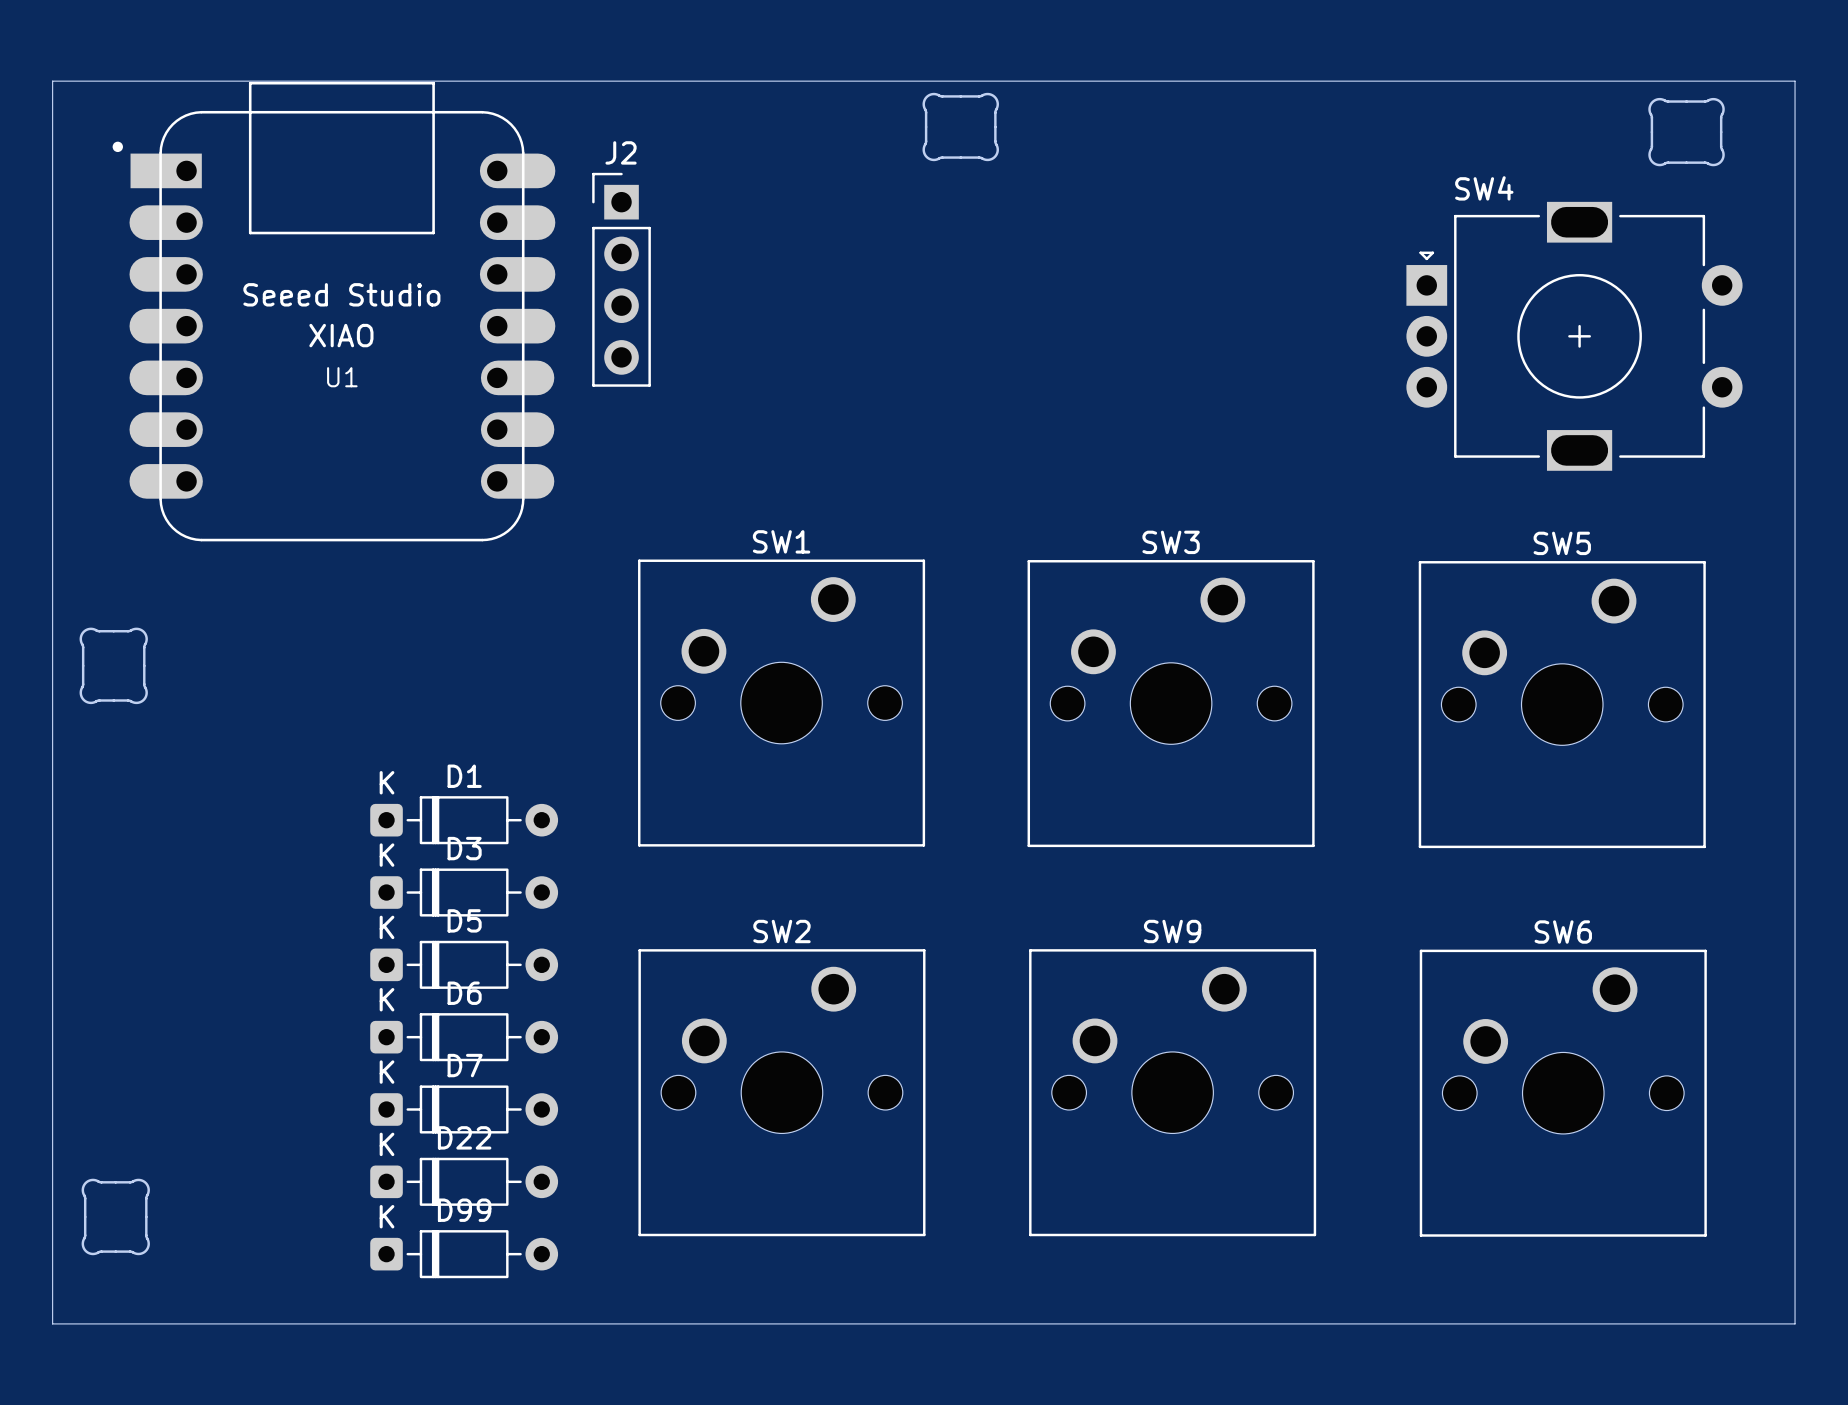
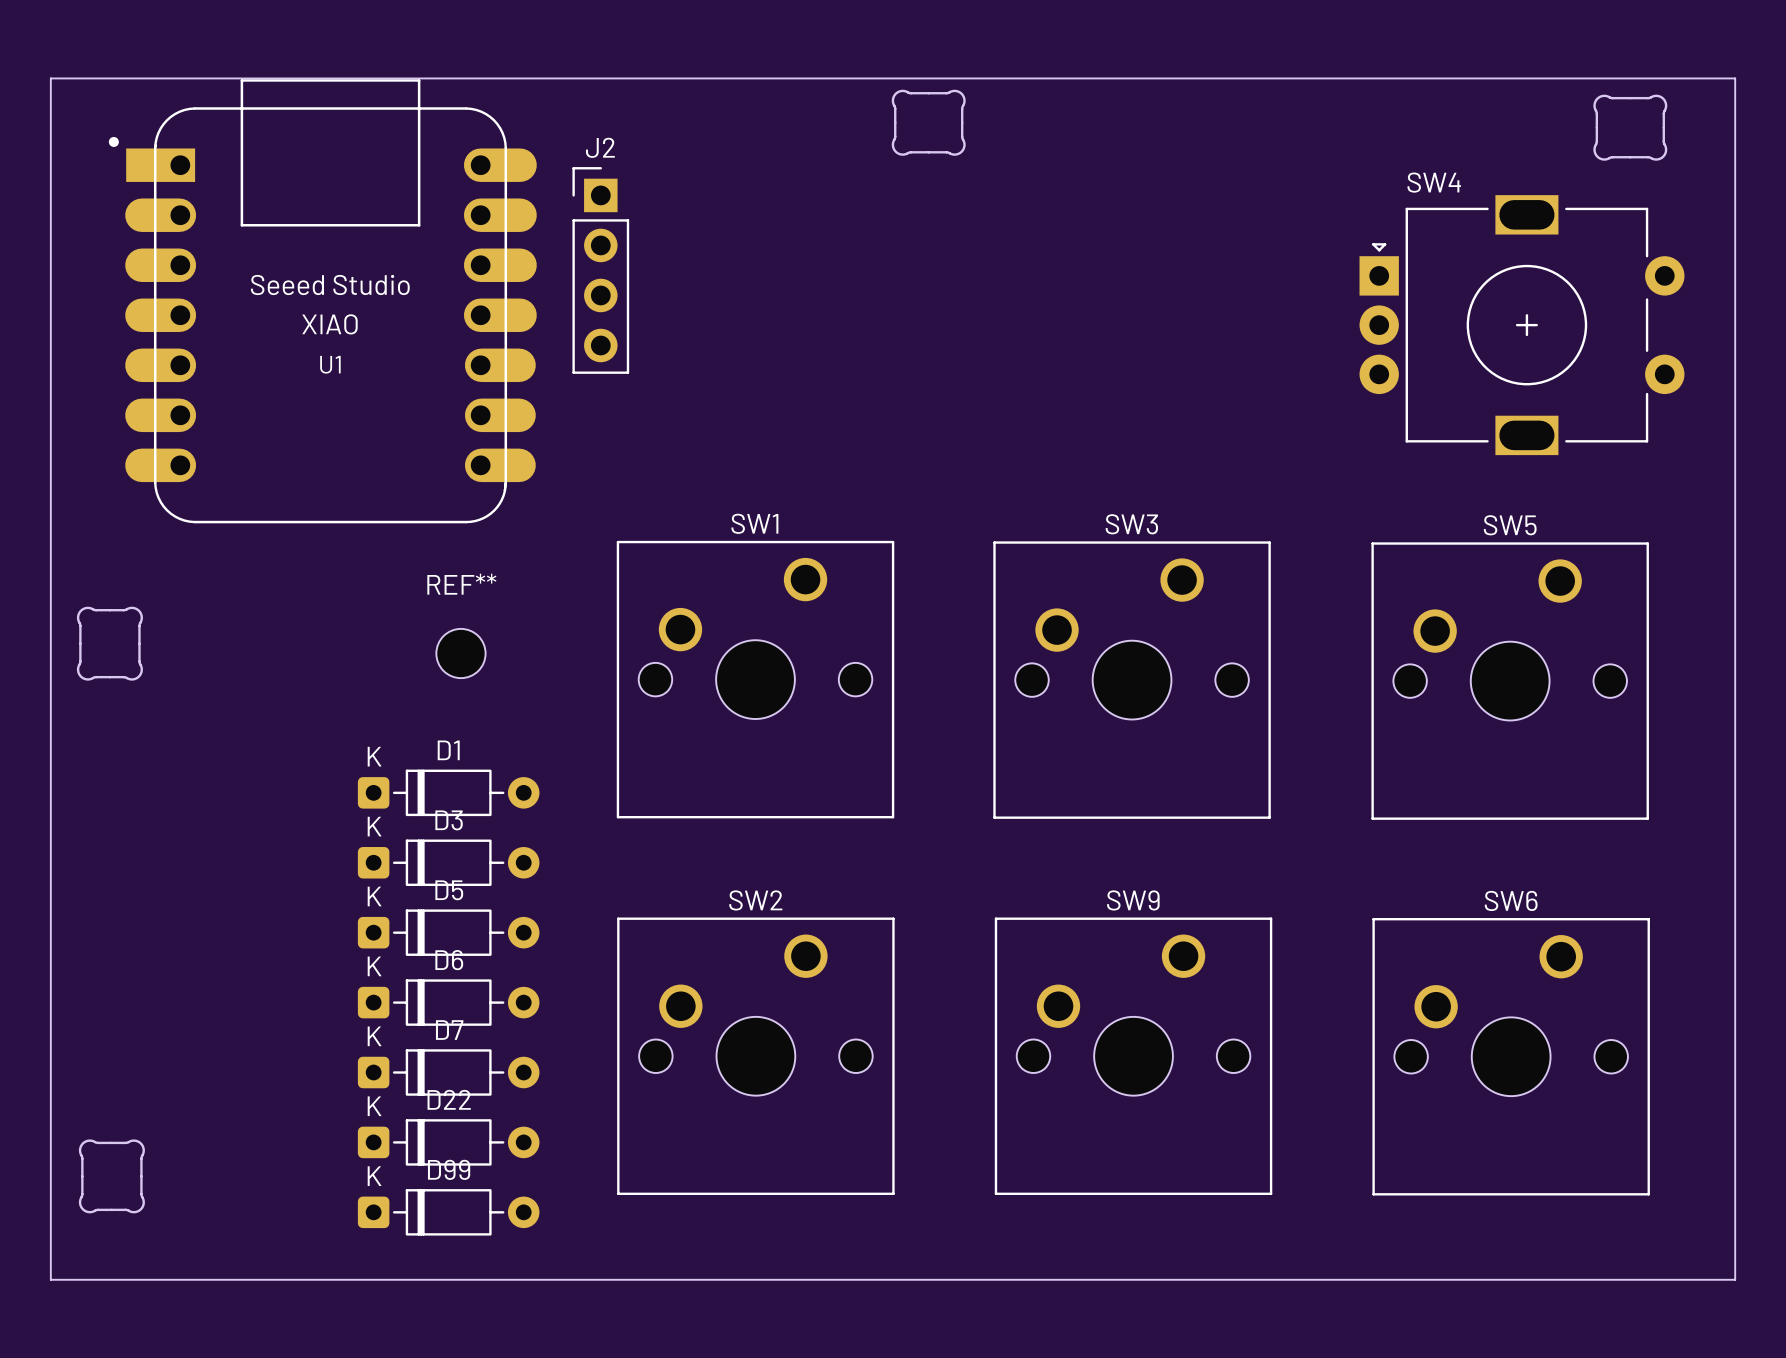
REF**: none -> (460, 653)

